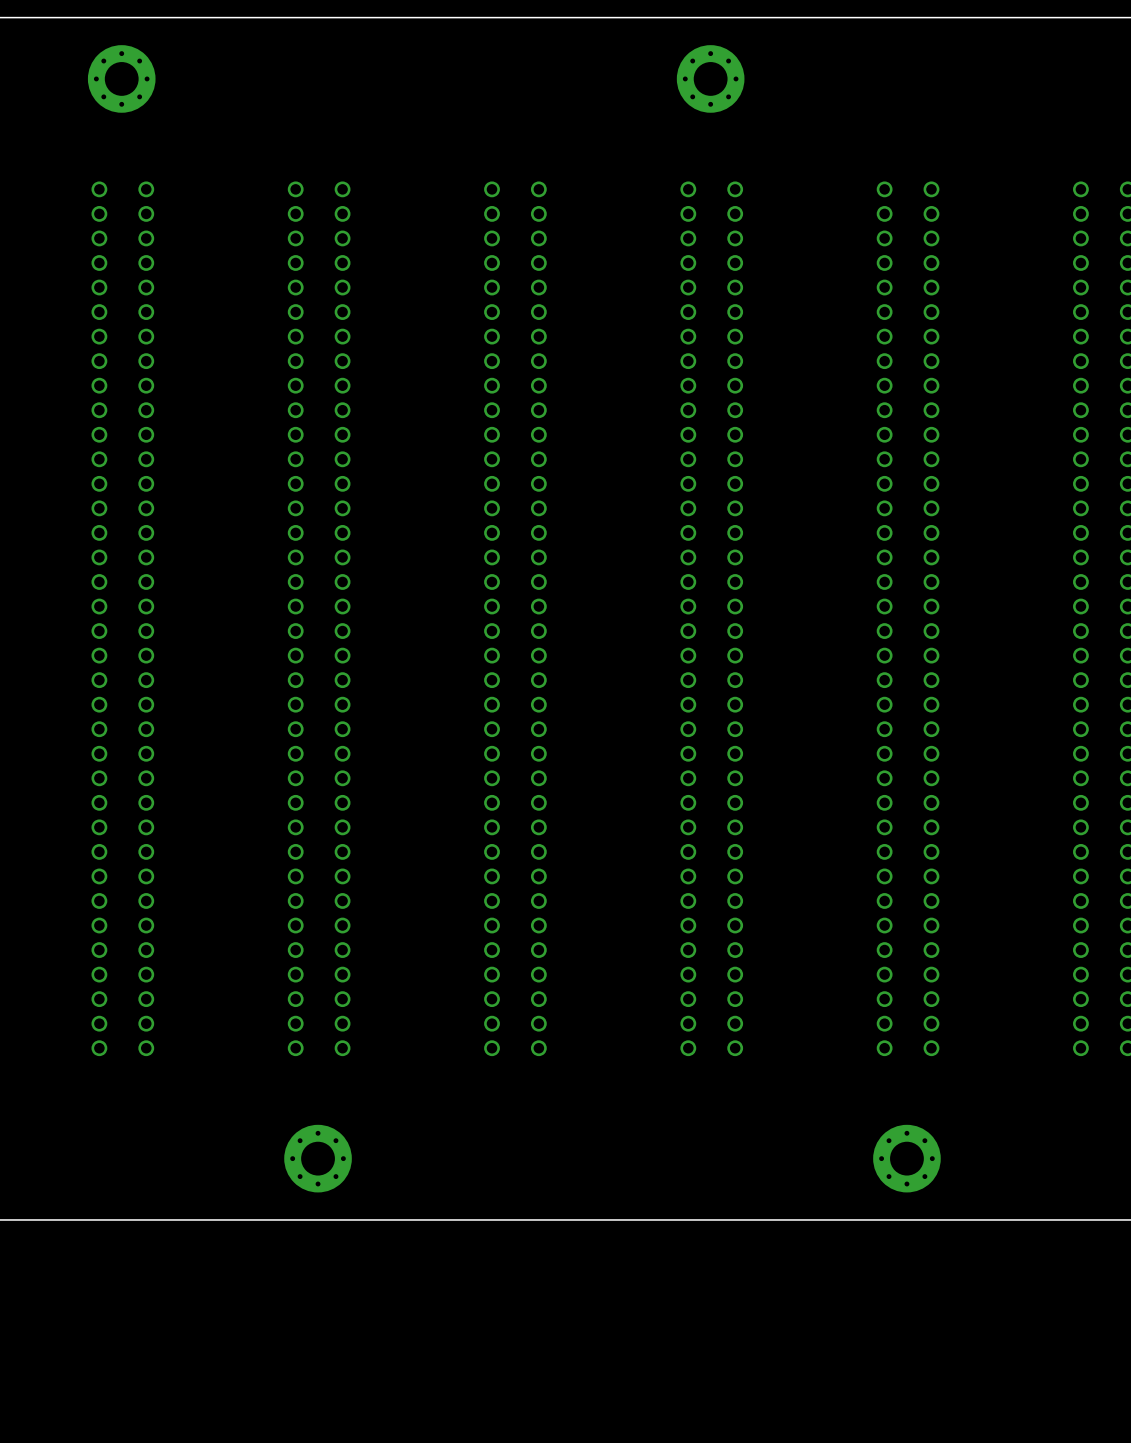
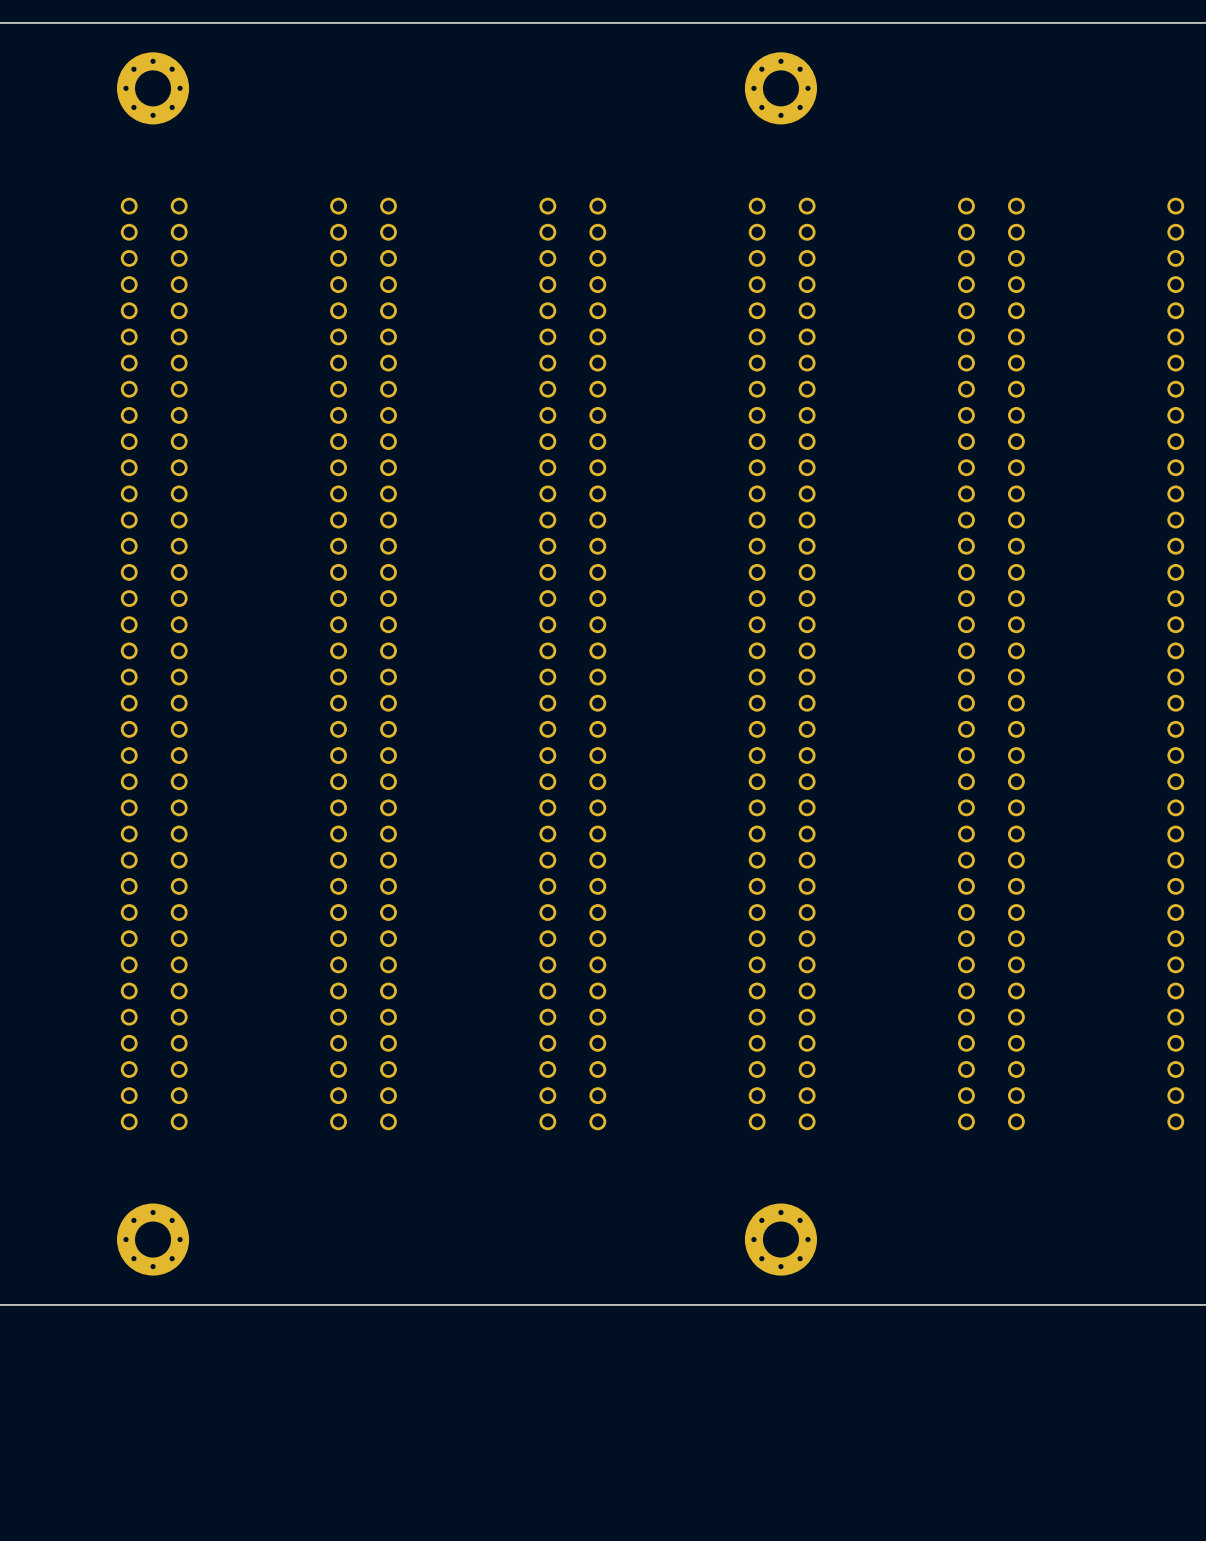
part: none -> (153, 1239)
part: (318, 1158) -> none
part: none -> (780, 1239)
part: (906, 1158) -> none

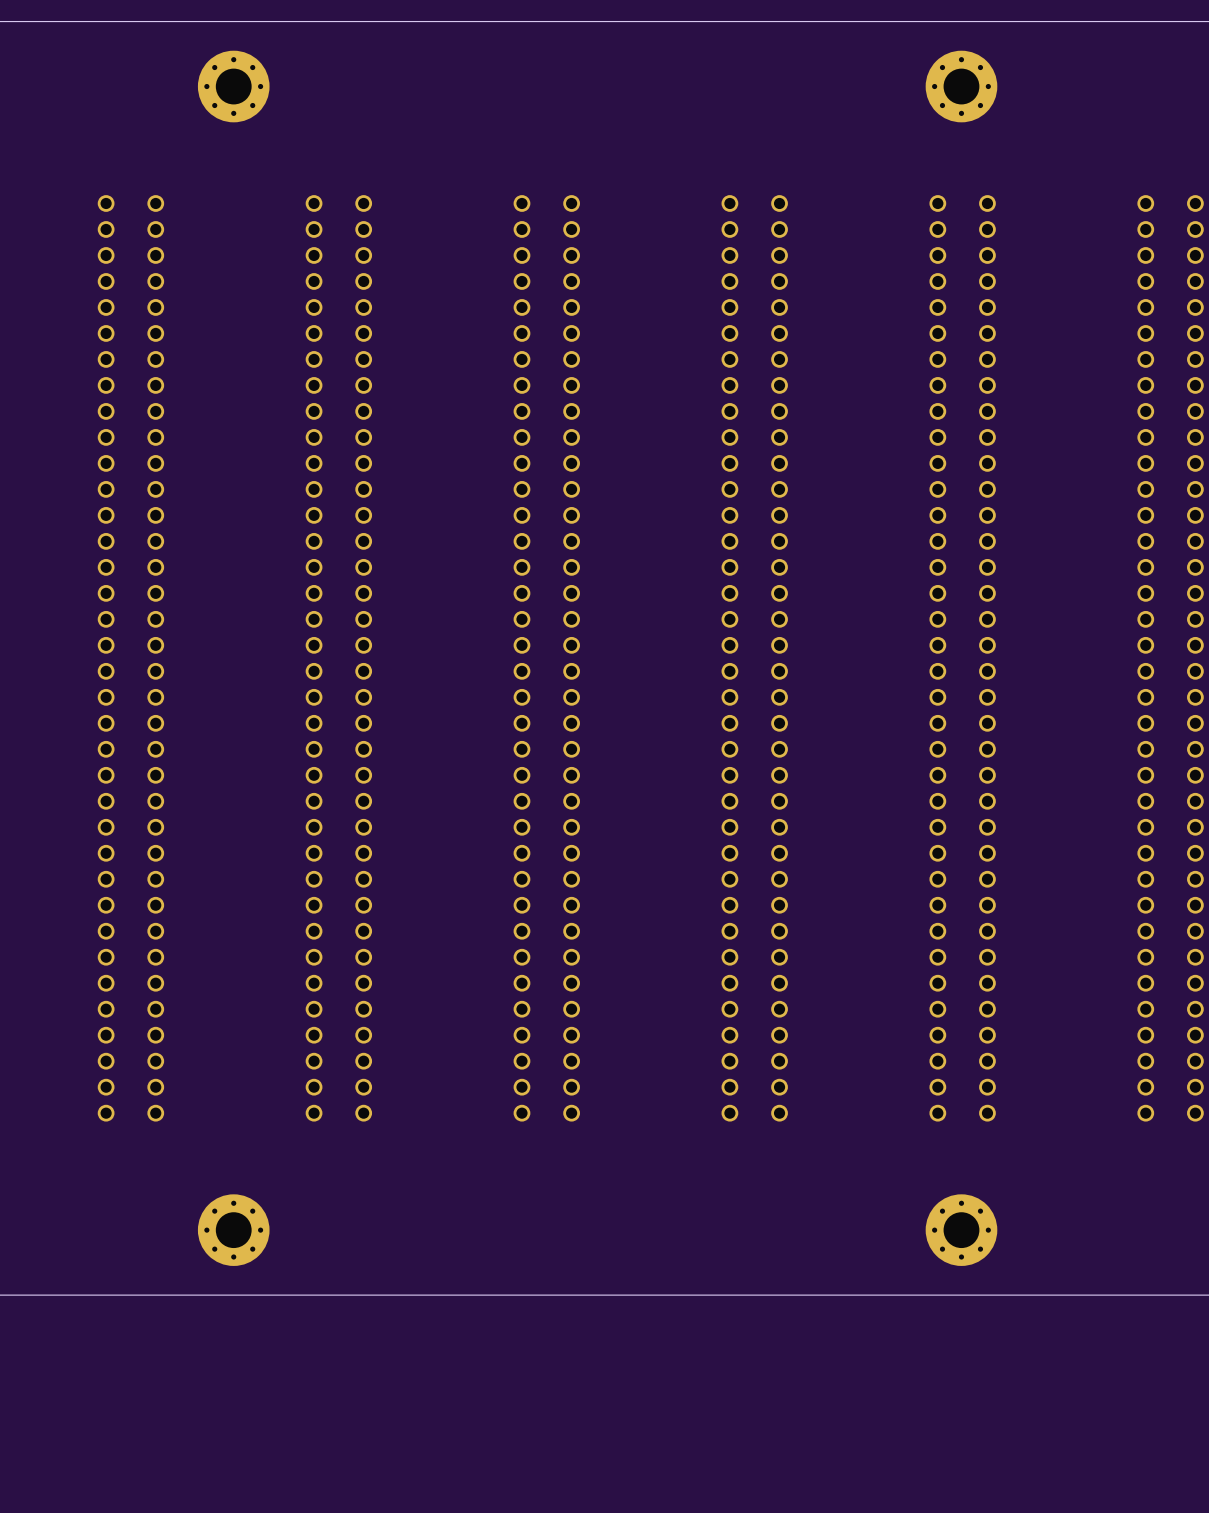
part position: (153, 88) -> (233, 86)
part position: (780, 88) -> (961, 86)
part position: (153, 1239) -> (233, 1230)
part position: (780, 1239) -> (961, 1230)

